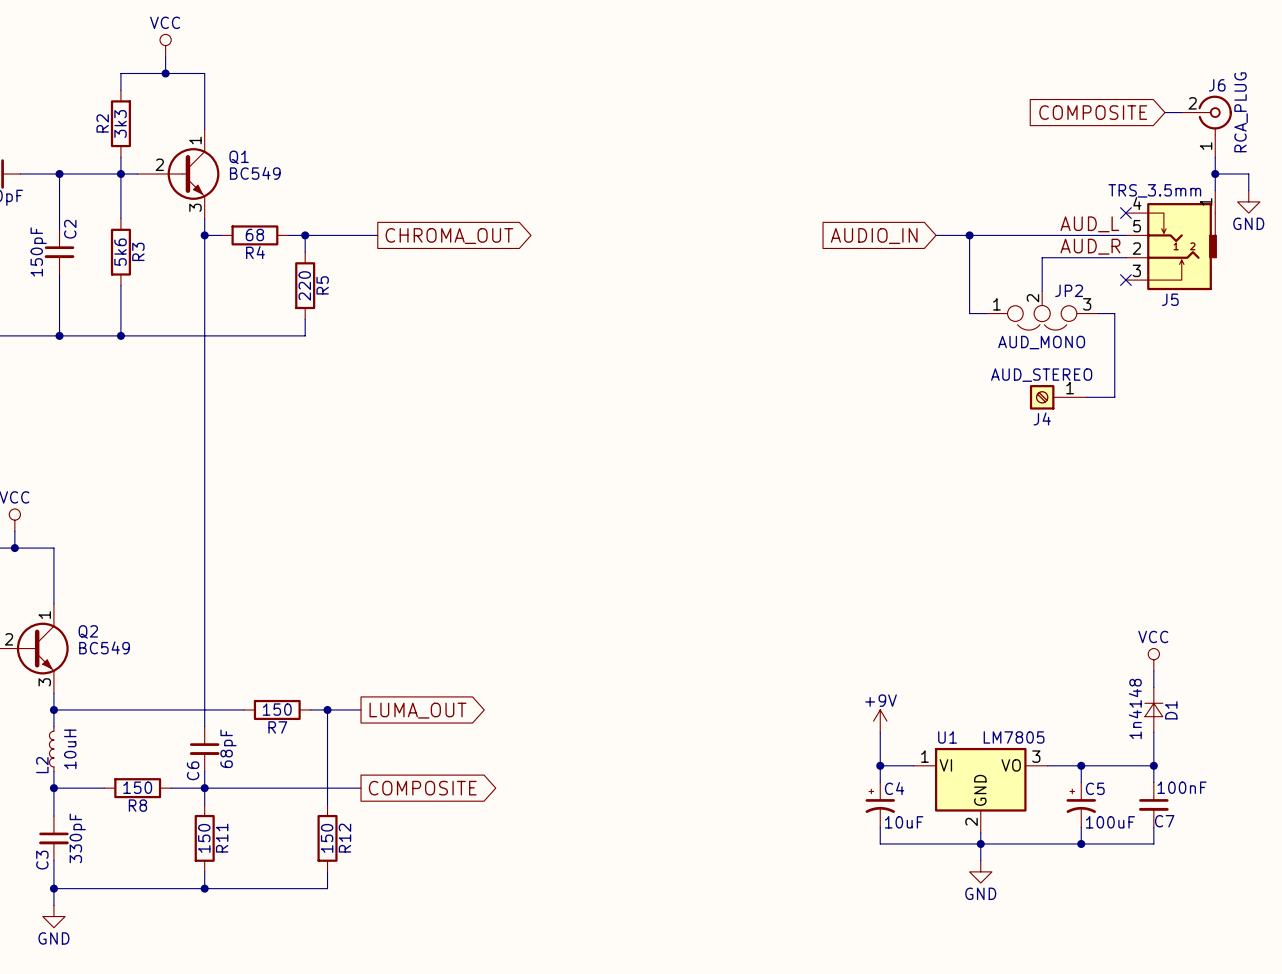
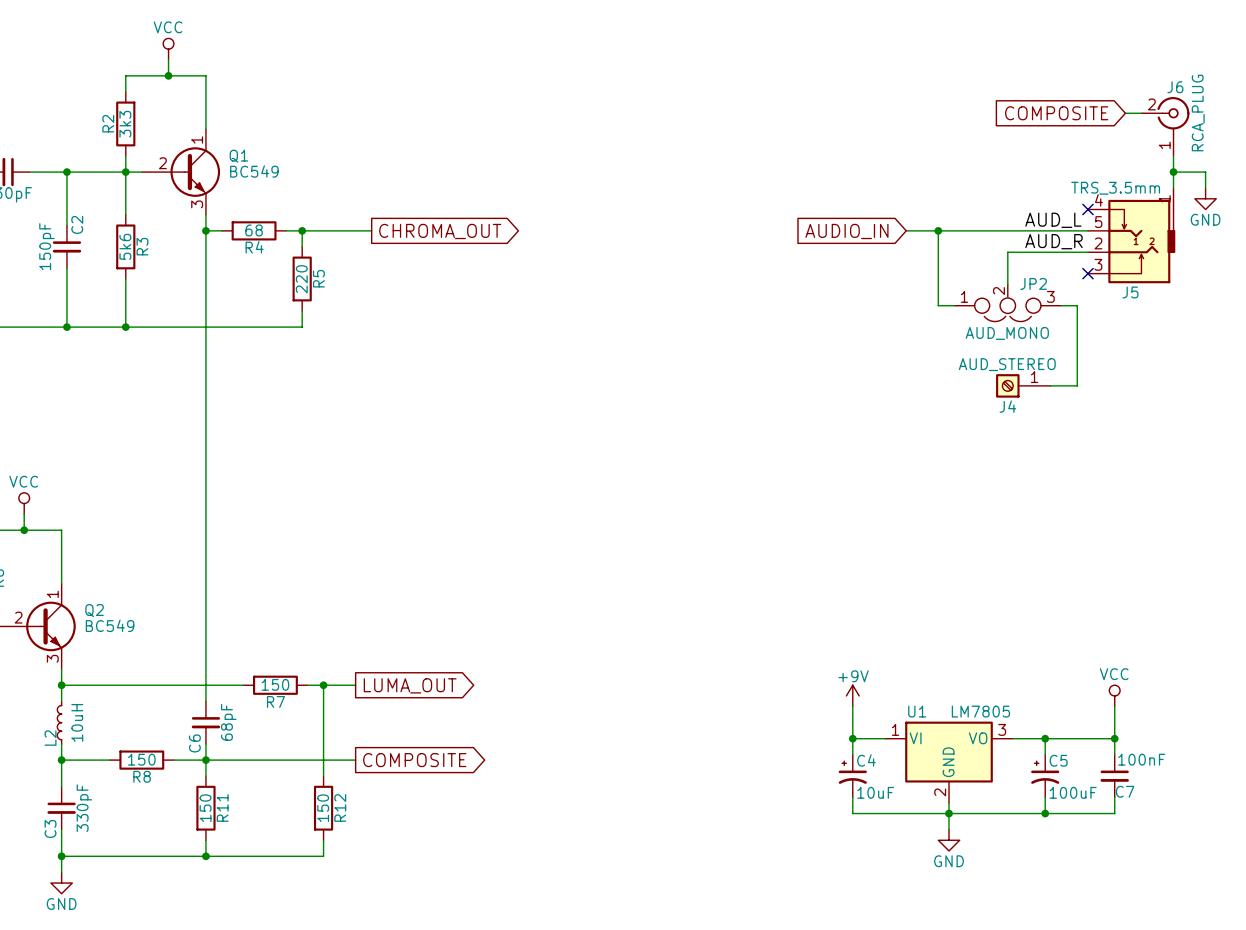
power symbol position: VCC (1153, 659) -> VCC (1114, 695)
wire: (1153, 670) (1153, 687) -> none
D1: 1n4148 (1153, 709) -> none

